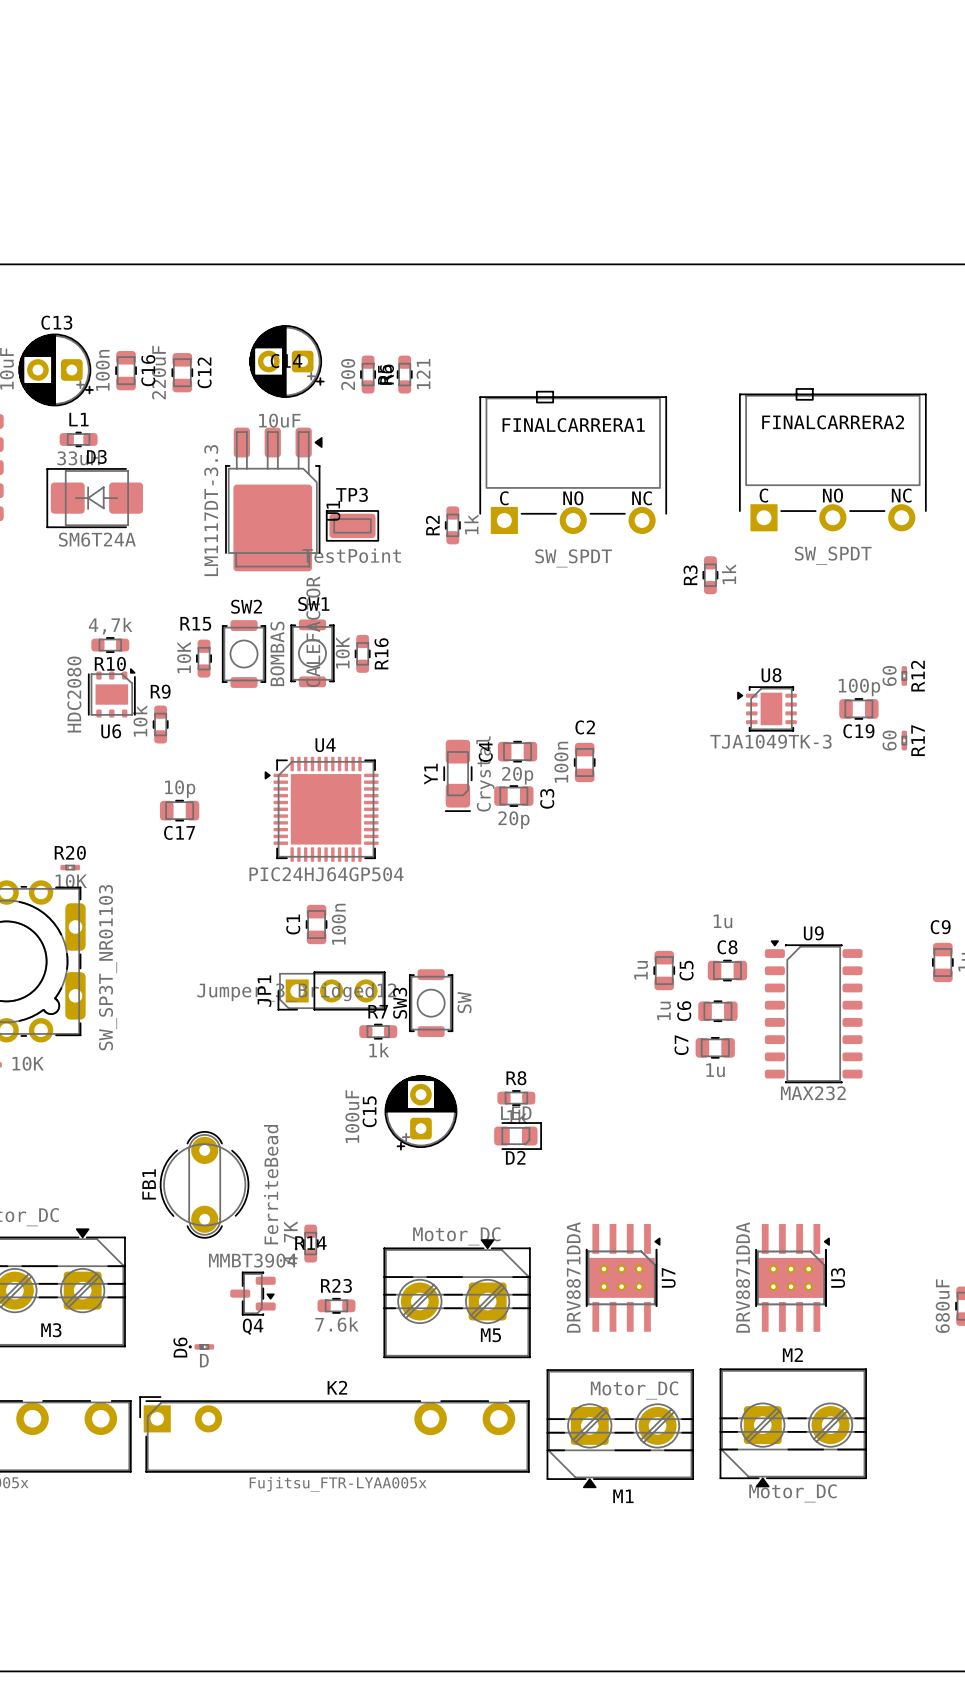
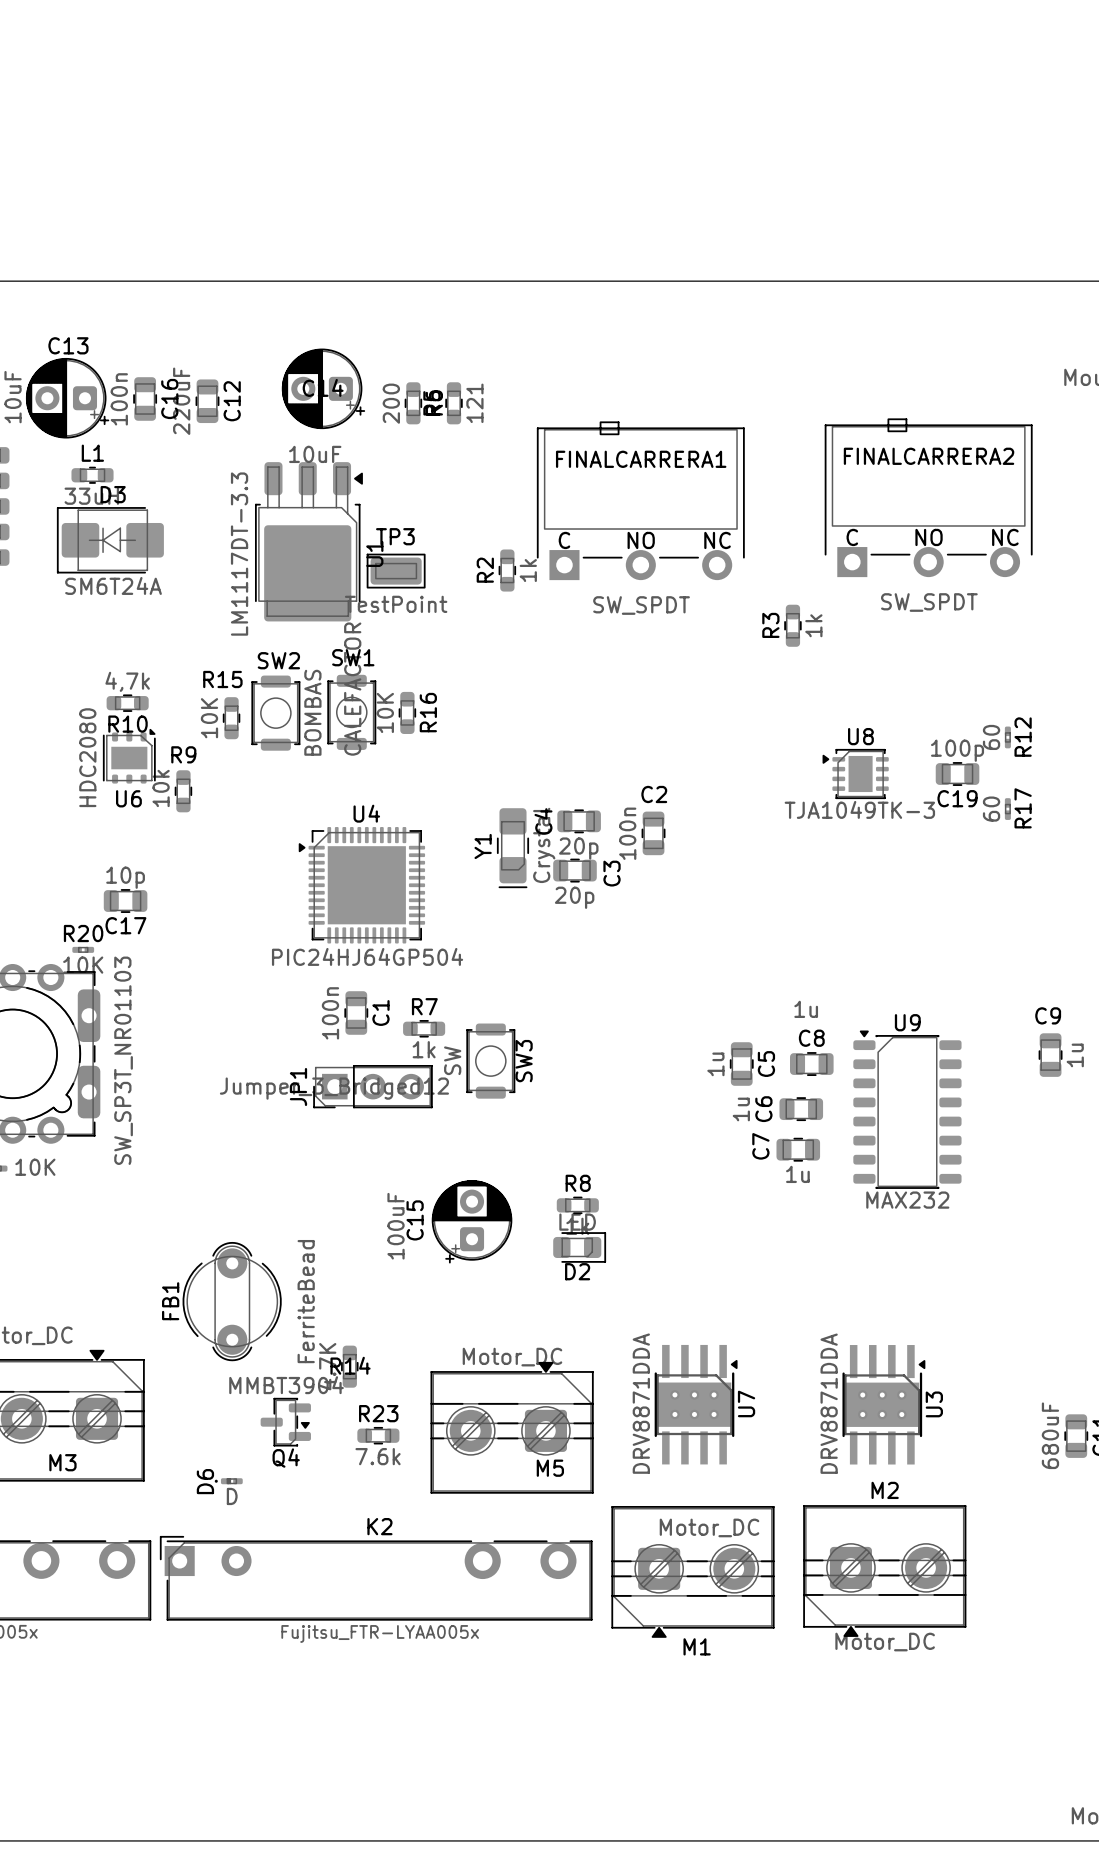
C17 position: (179, 810) -> (125, 901)
C1 name position: C1 (293, 924) -> C1 (380, 1012)
C1 value position: 100n (338, 924) -> 100n (330, 1013)
SW3 value position: SW (464, 1002) -> SW (452, 1060)
SW3 name position: SW3 (400, 1003) -> SW3 (524, 1061)
SW3 position: (431, 1003) -> (490, 1061)
R7 position: (378, 1031) -> (424, 1028)

